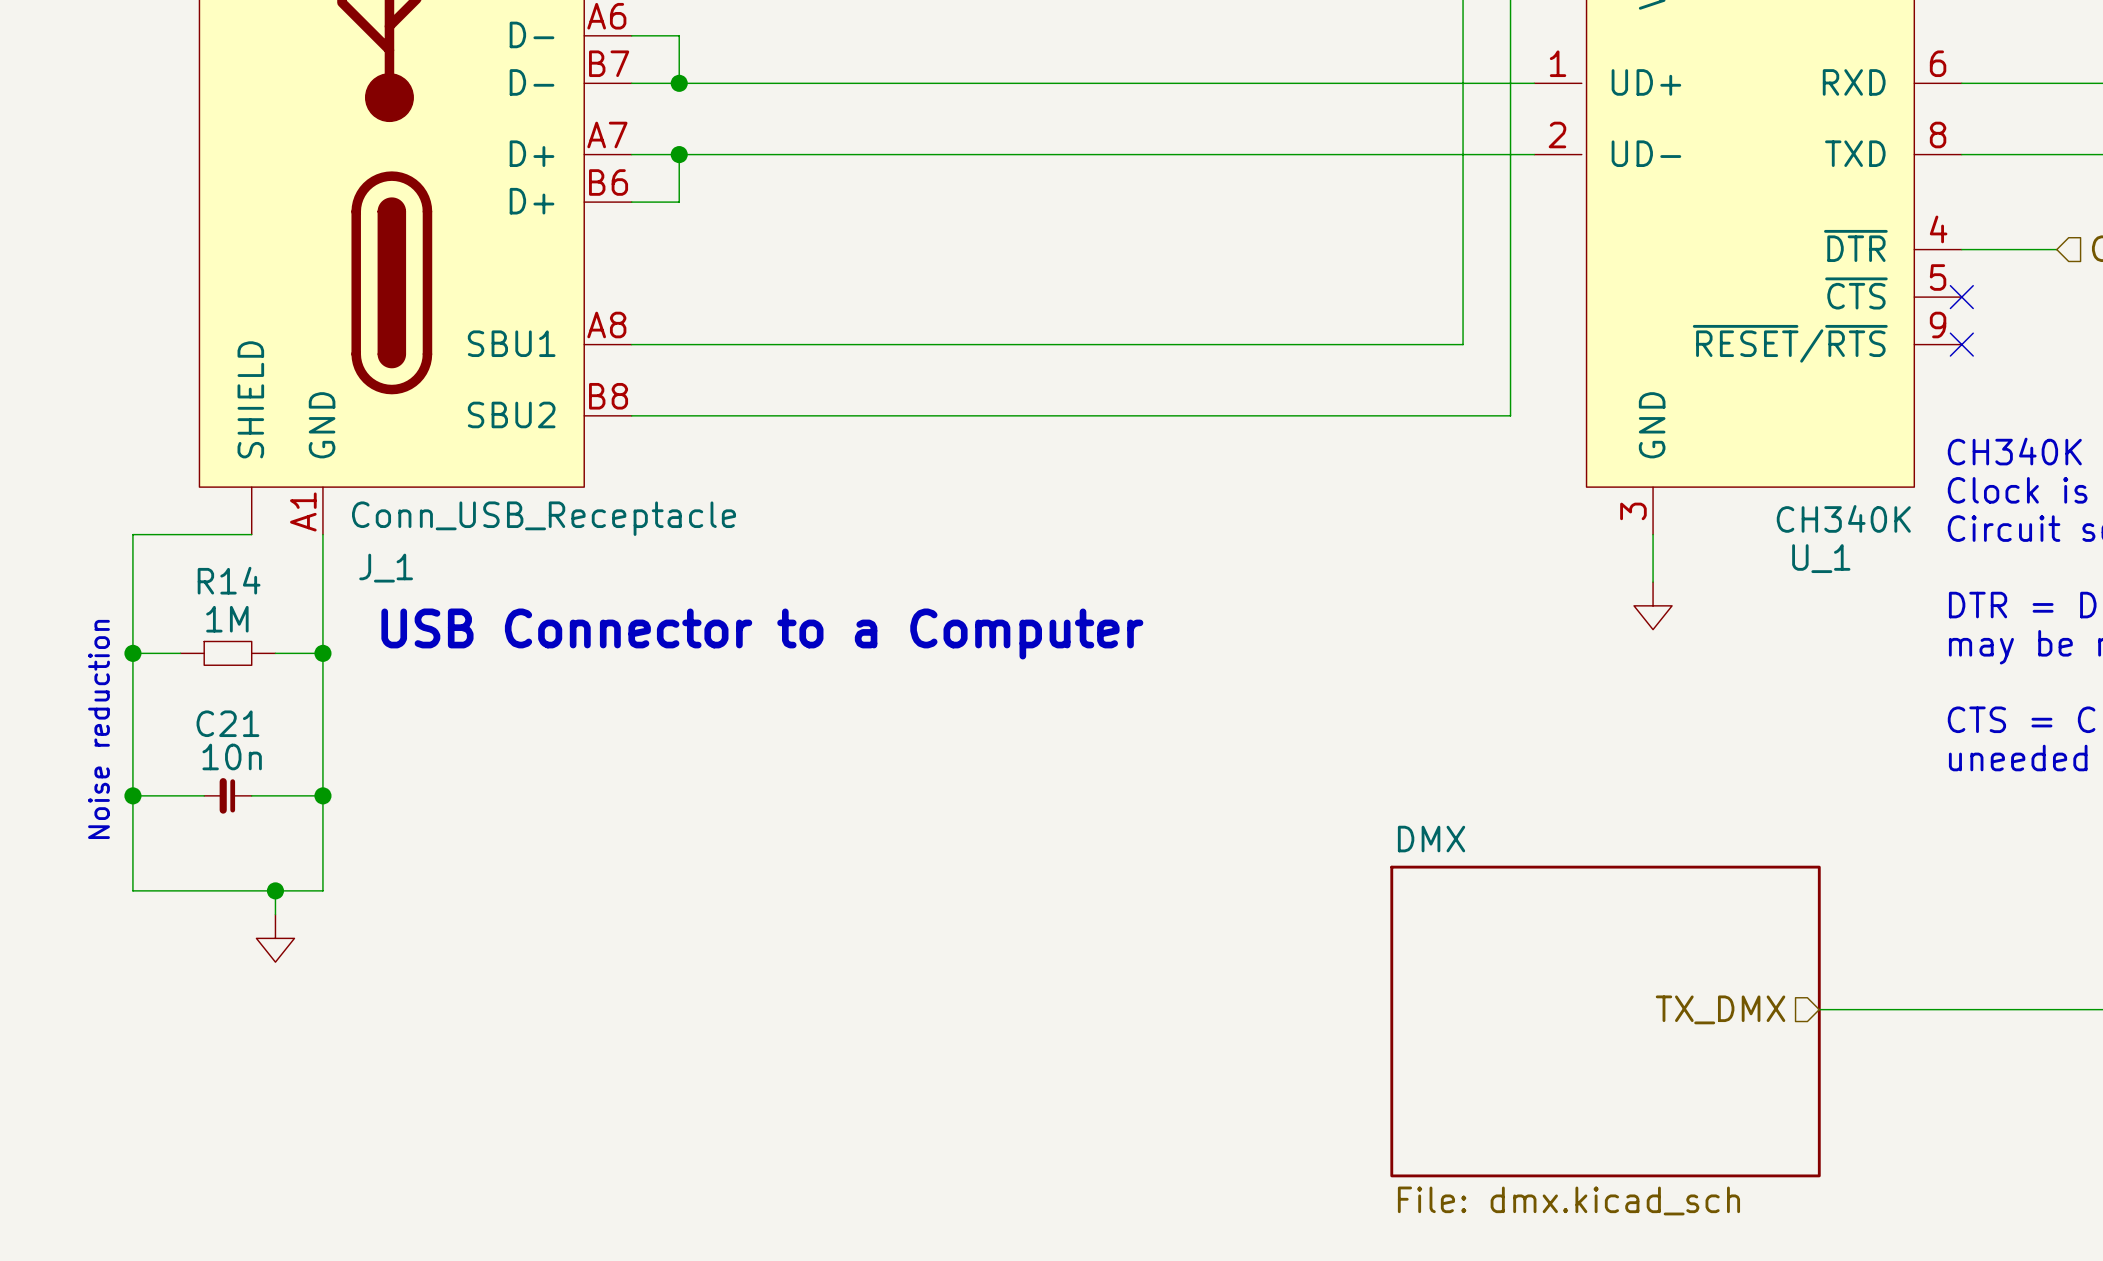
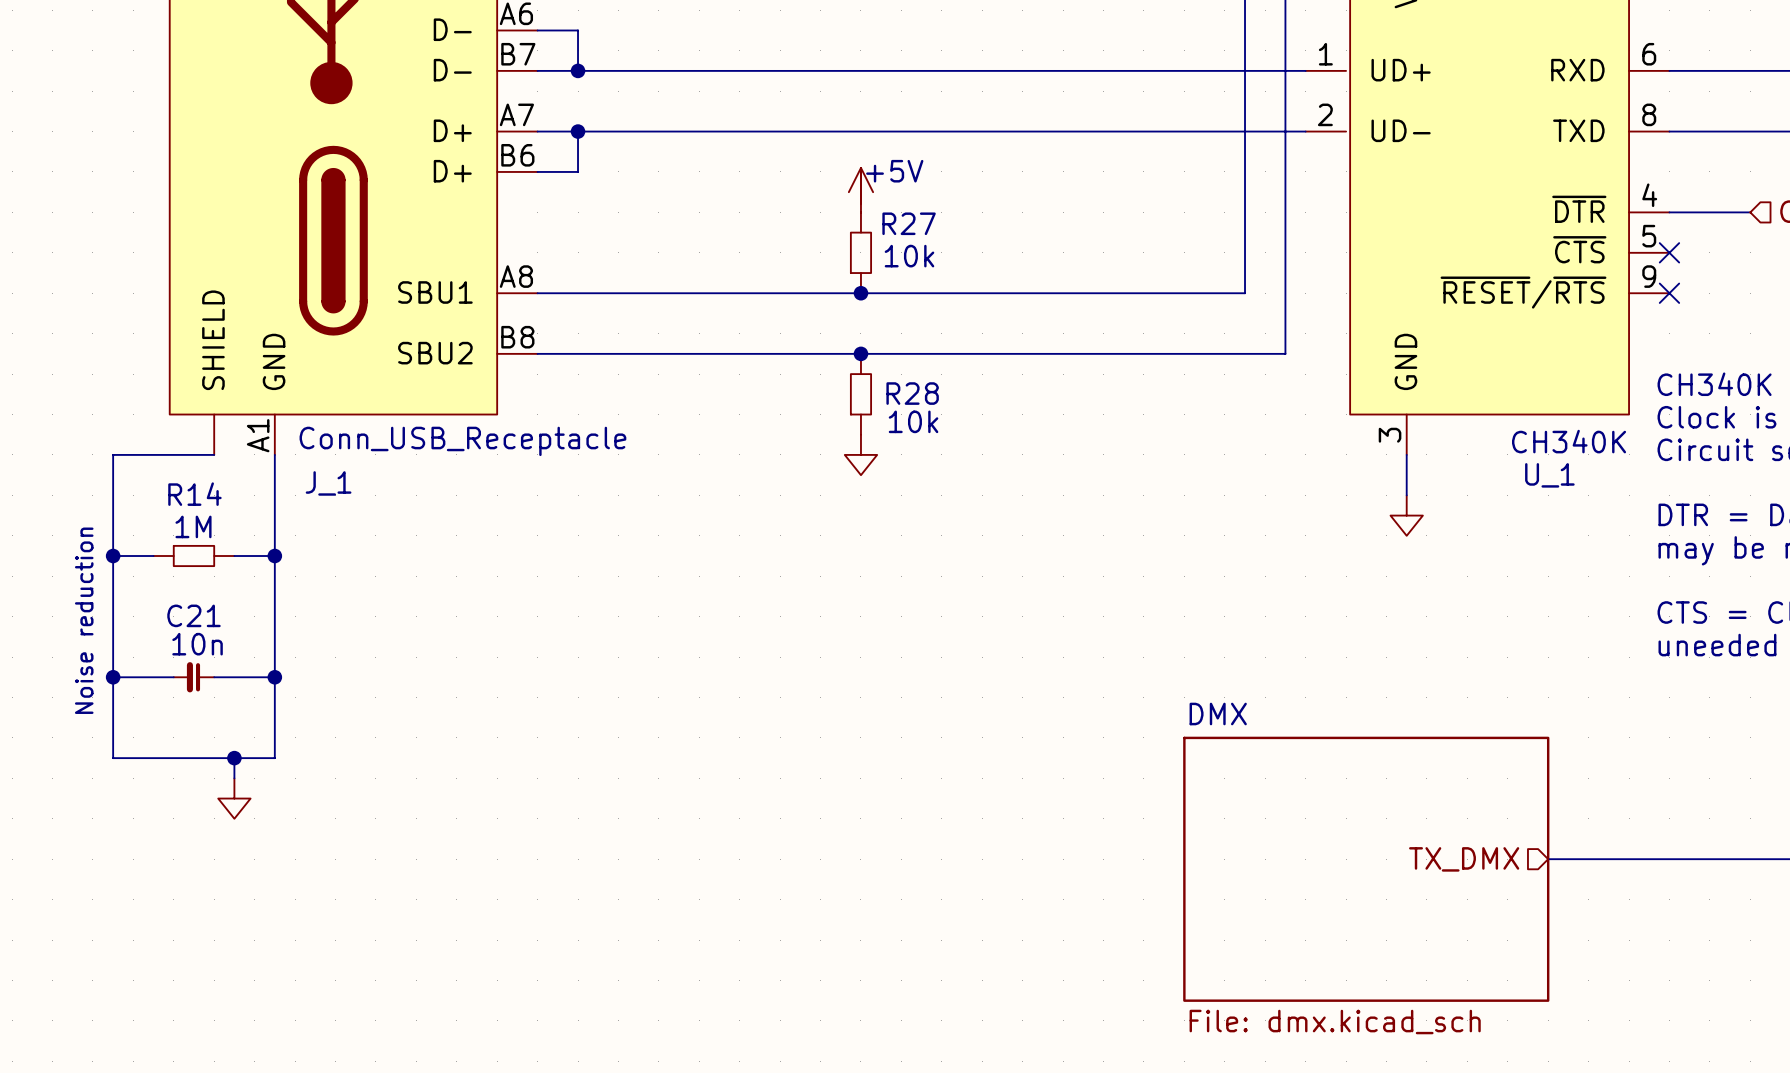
power symbol: none -> +5V (860, 190)
R27: none -> 10k (860, 252)
junction: none -> (860, 293)
junction: none -> (860, 353)
R28: none -> 10k (860, 394)
power symbol: none -> (860, 454)
text: USB Connector to a Computer (762, 633) -> none

